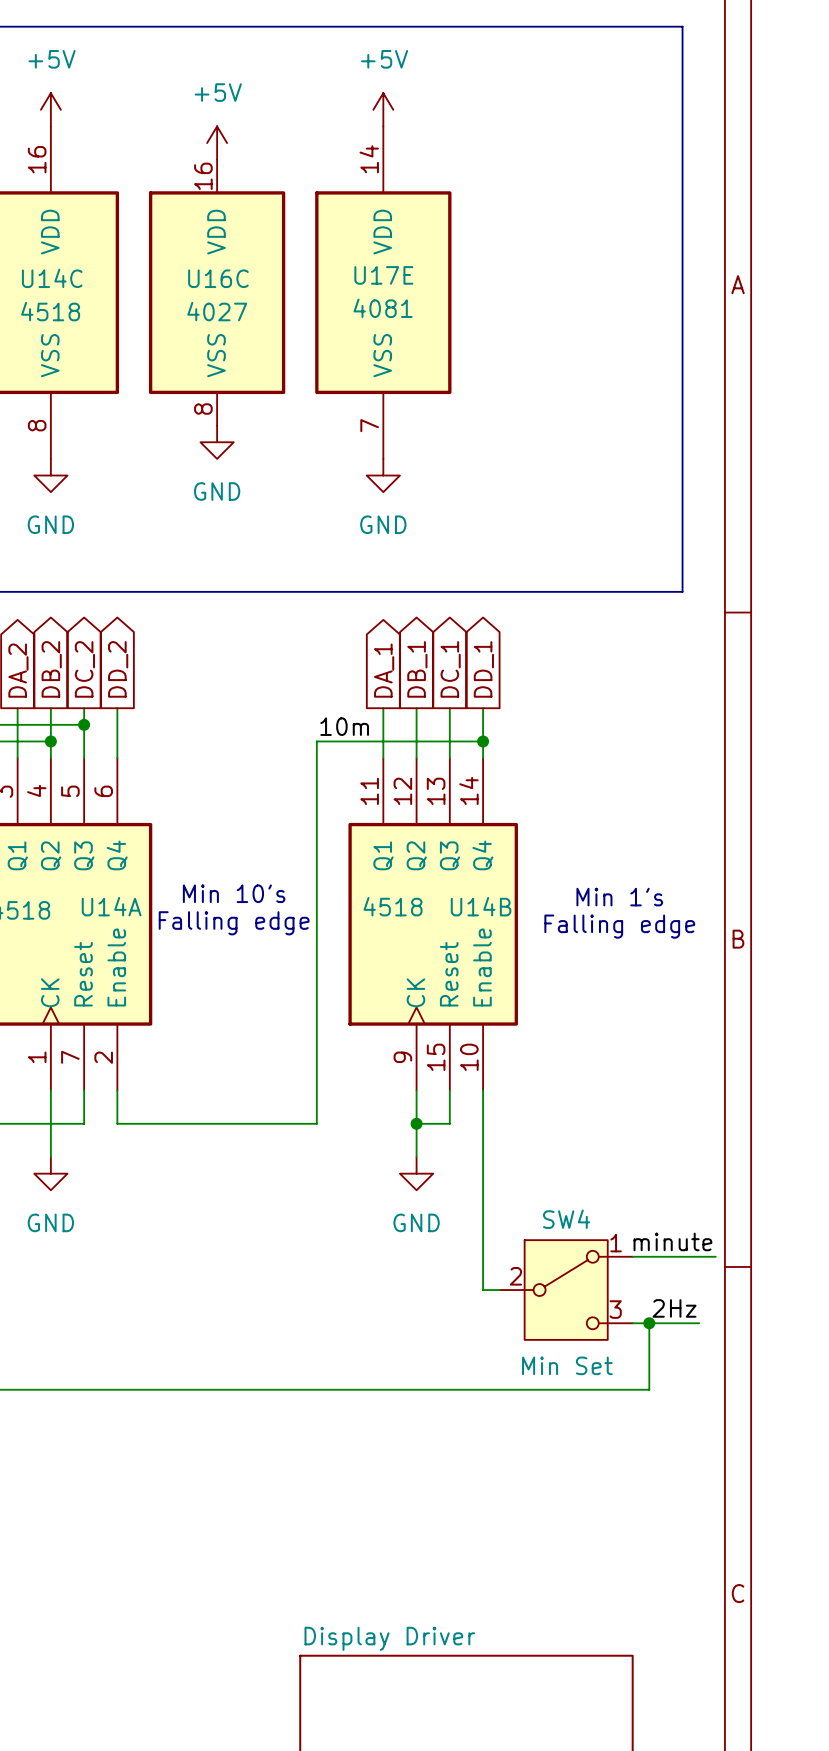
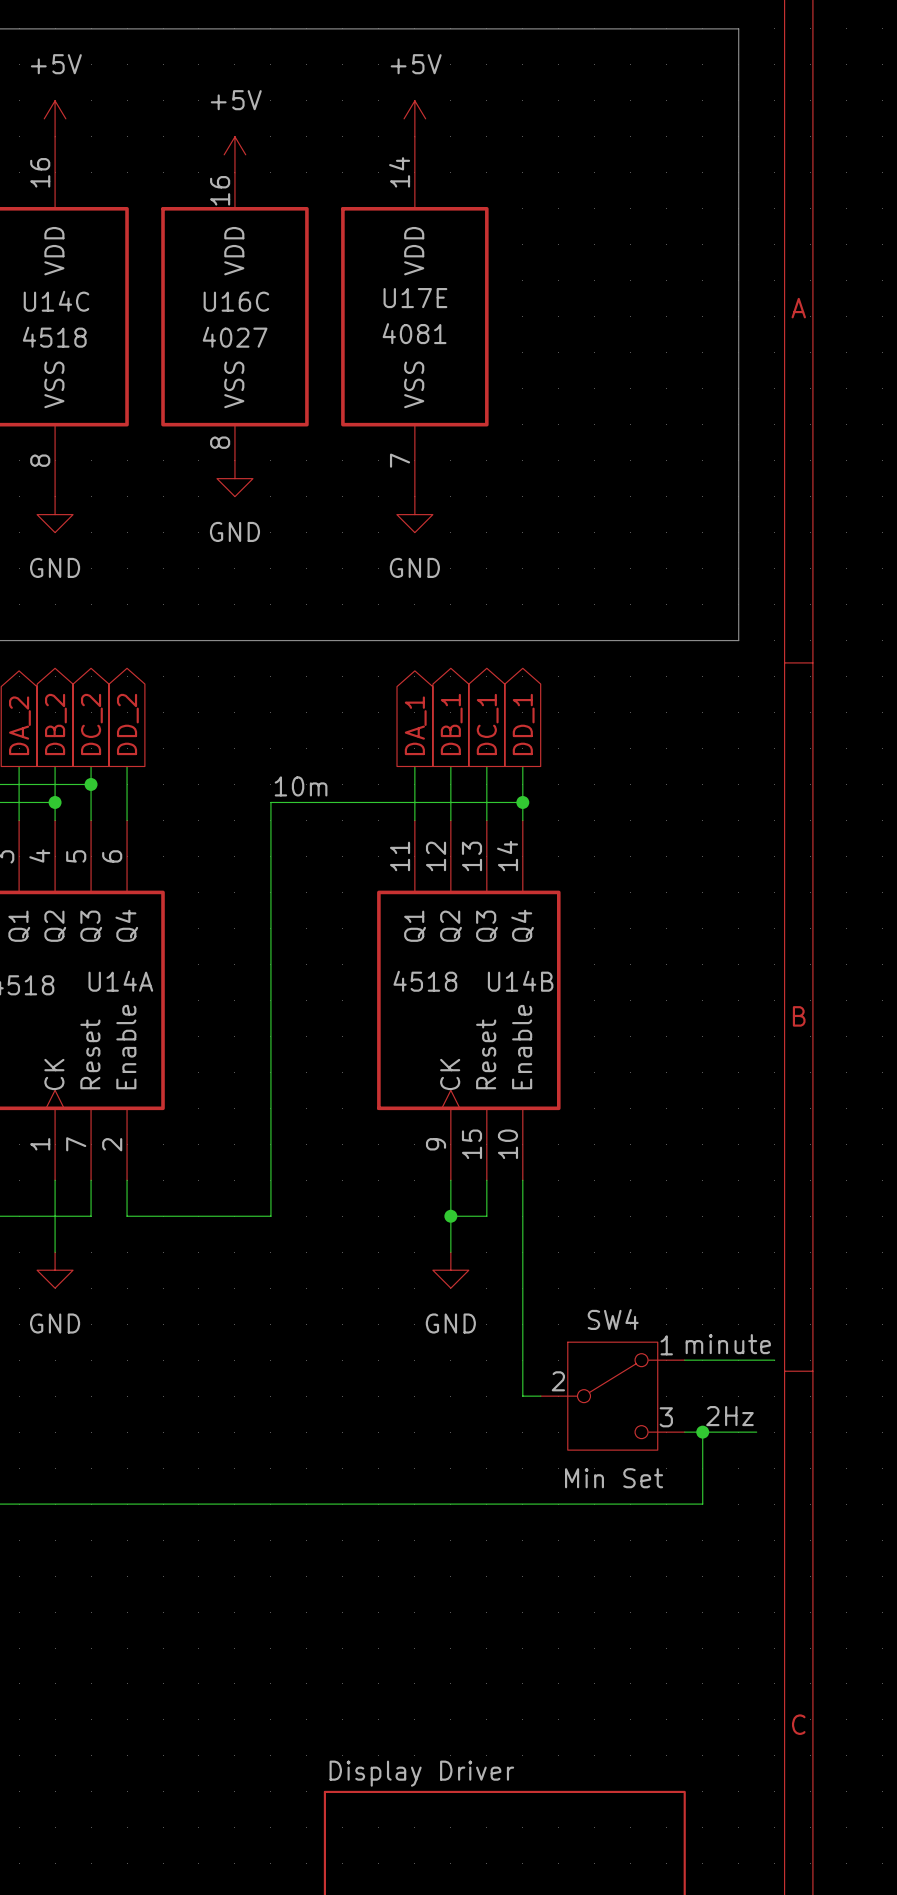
label position: 10m (344, 726) -> 10m (301, 786)
wire: (316, 741) (316, 1123) (250, 1123) -> (342, 802) (270, 802) (270, 1216)
text: Min 10's (234, 893) -> none
text: Min 1's (619, 897) -> none
text: Falling edge (234, 923) -> none
text: Falling edge (619, 926) -> none

